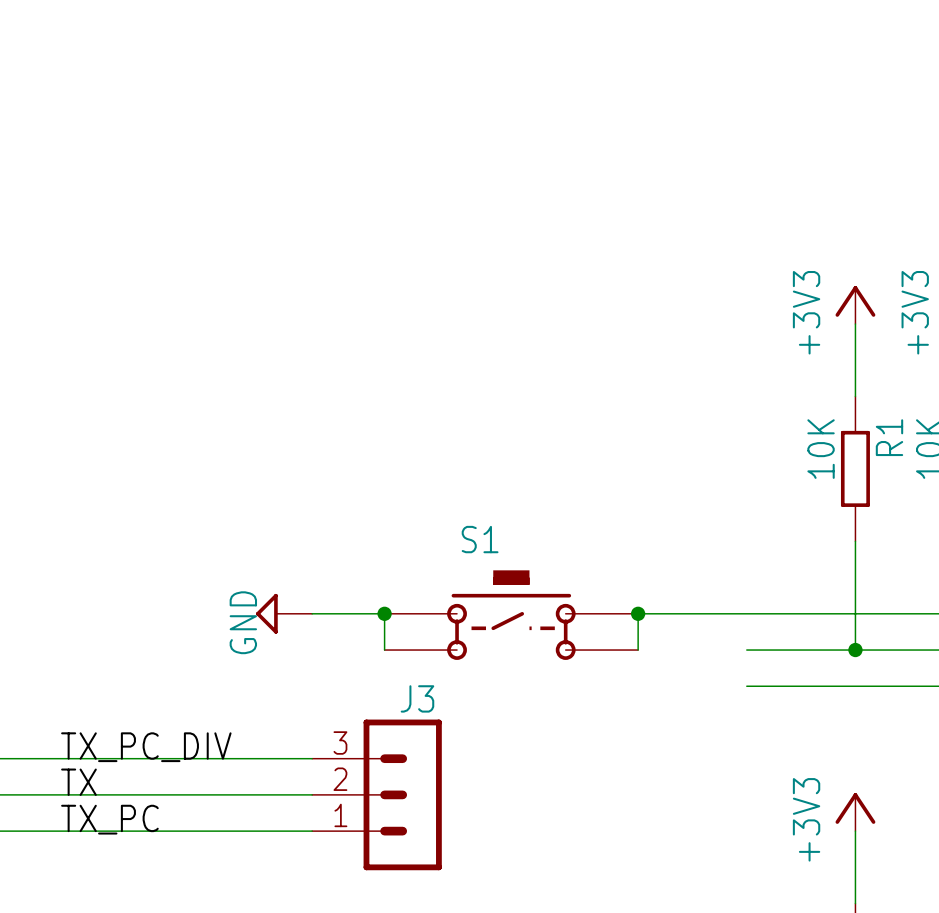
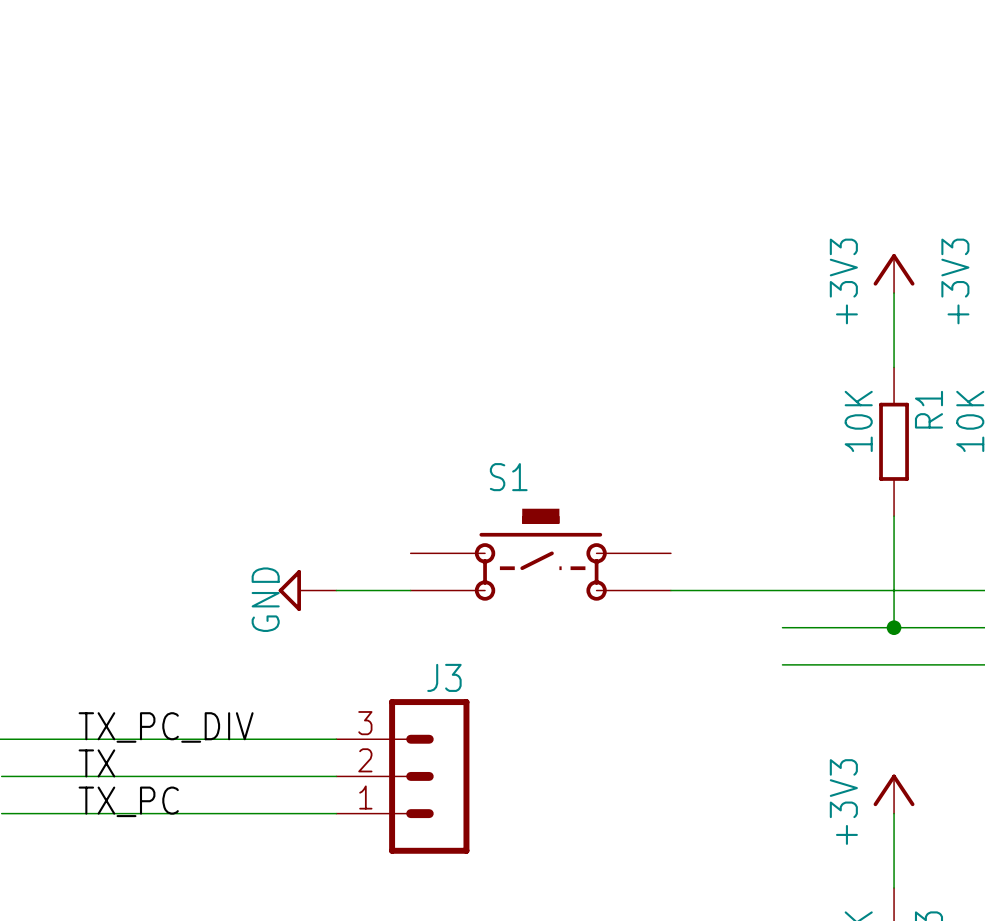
wire: (384, 613) (384, 650) -> none
junction: (384, 613) -> none
wire: (638, 613) (638, 650) -> none
junction: (638, 613) -> none
S1 position: (511, 615) -> (540, 554)

